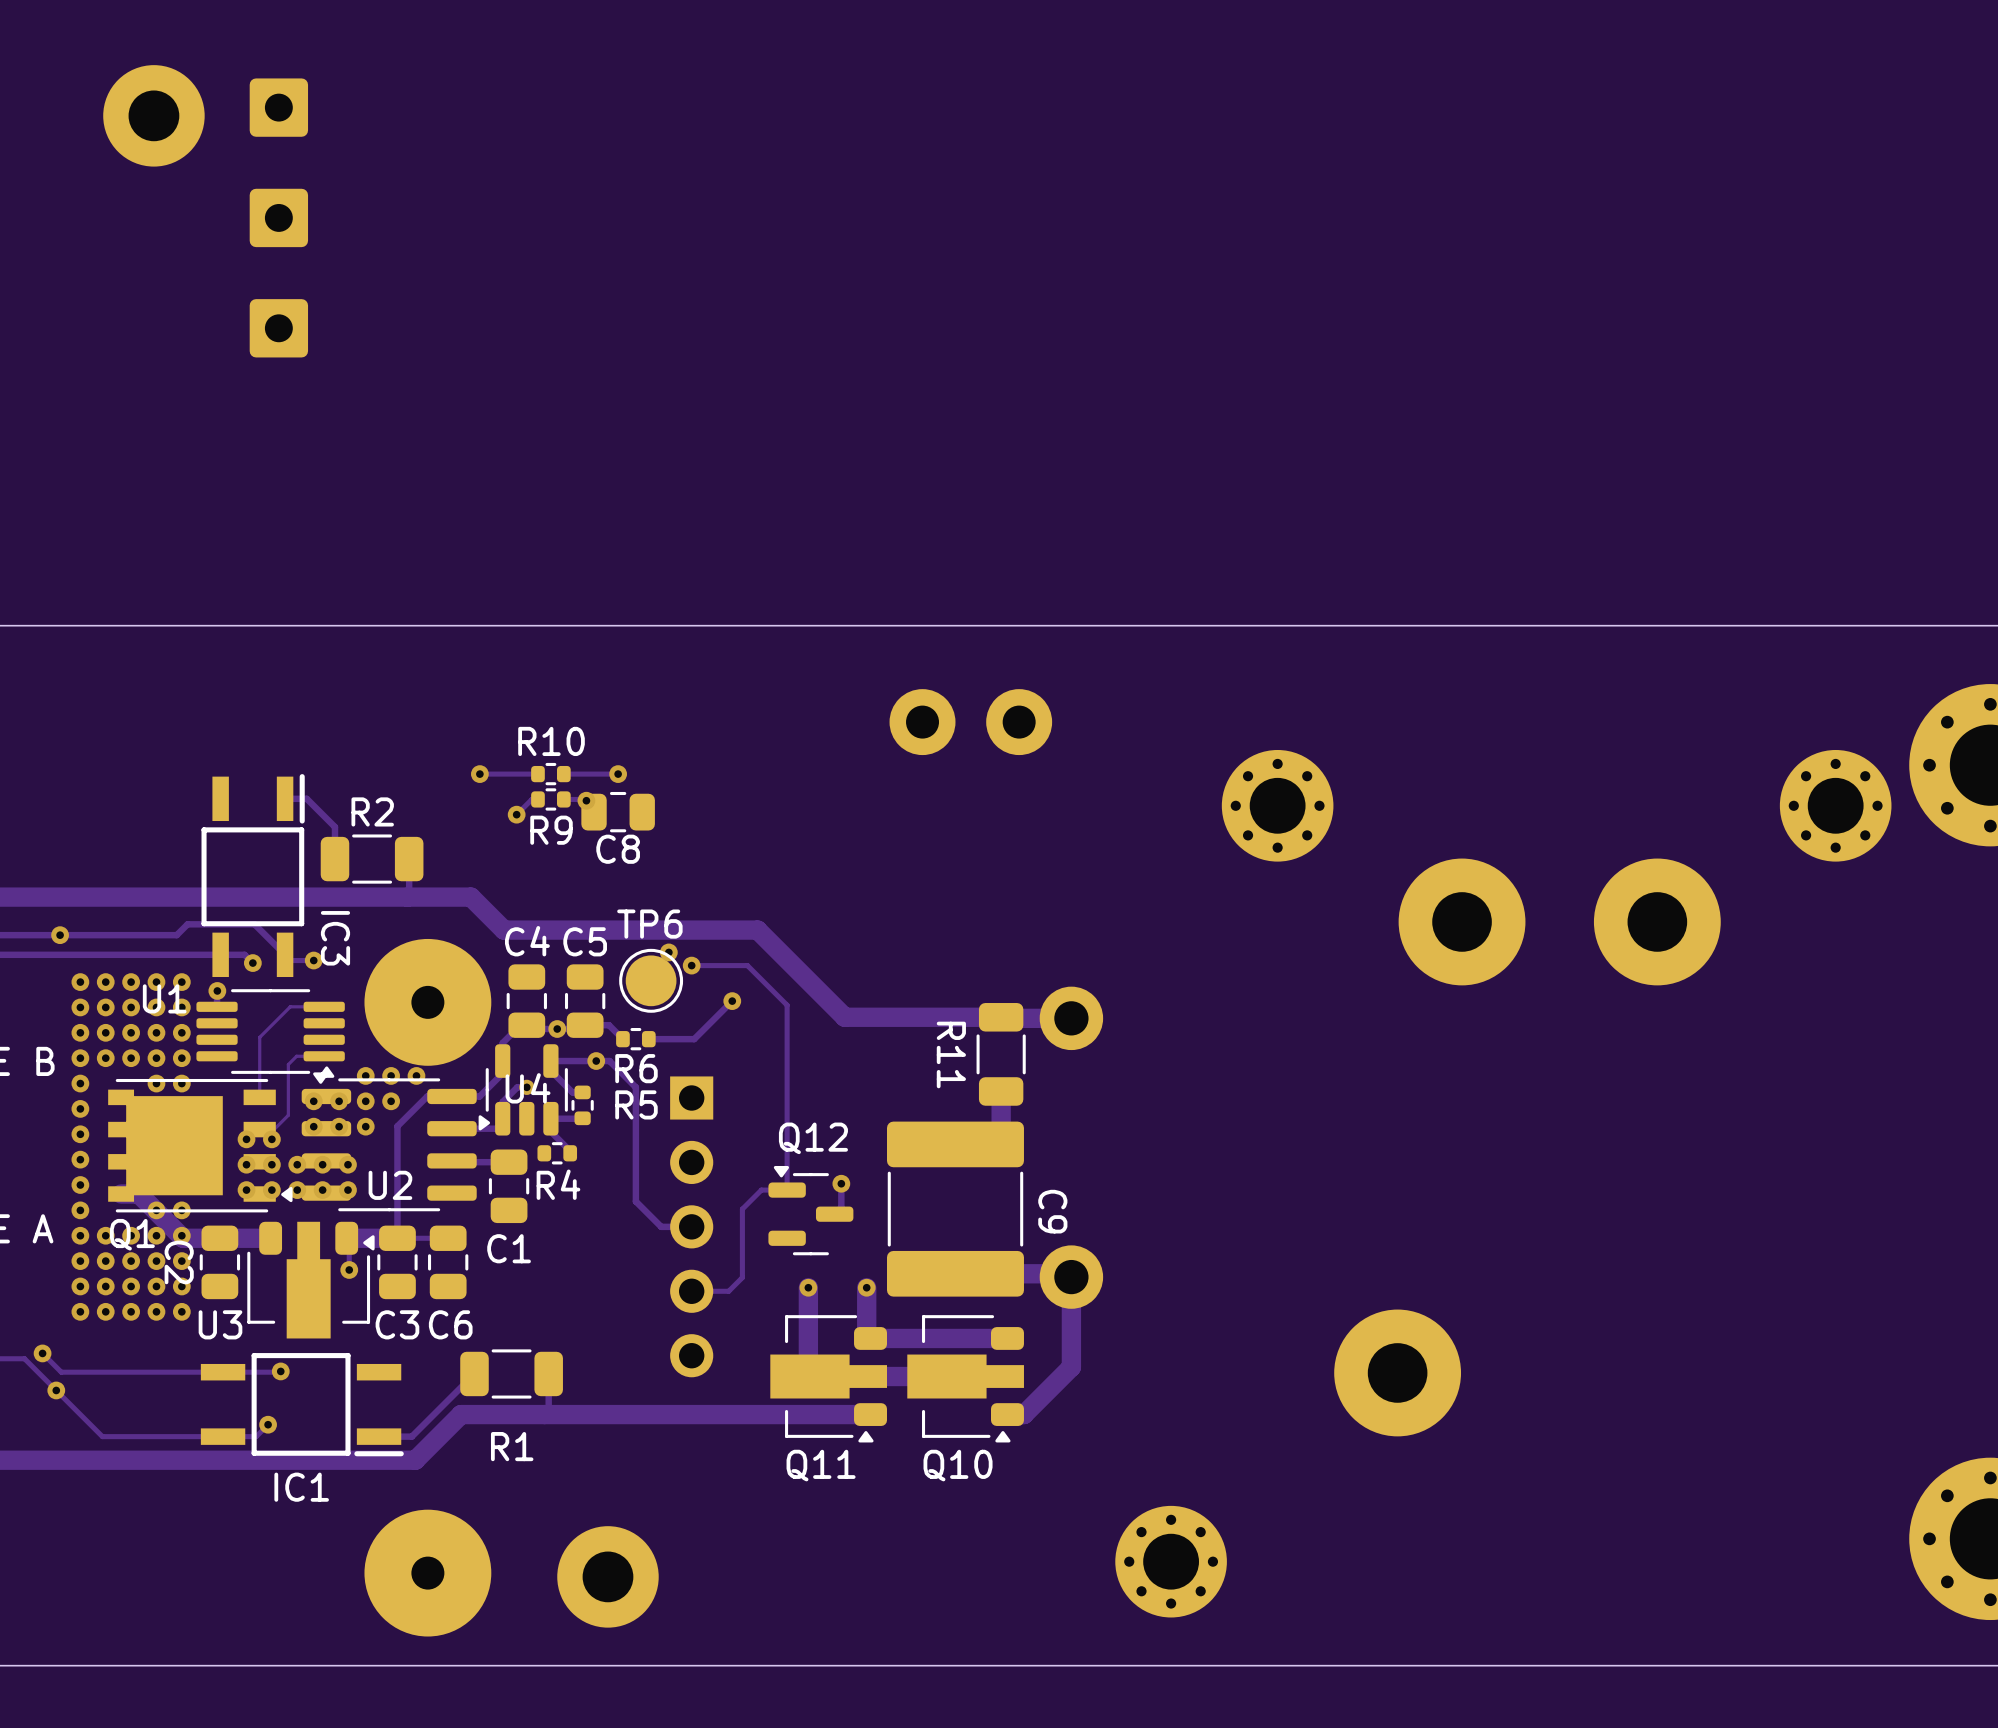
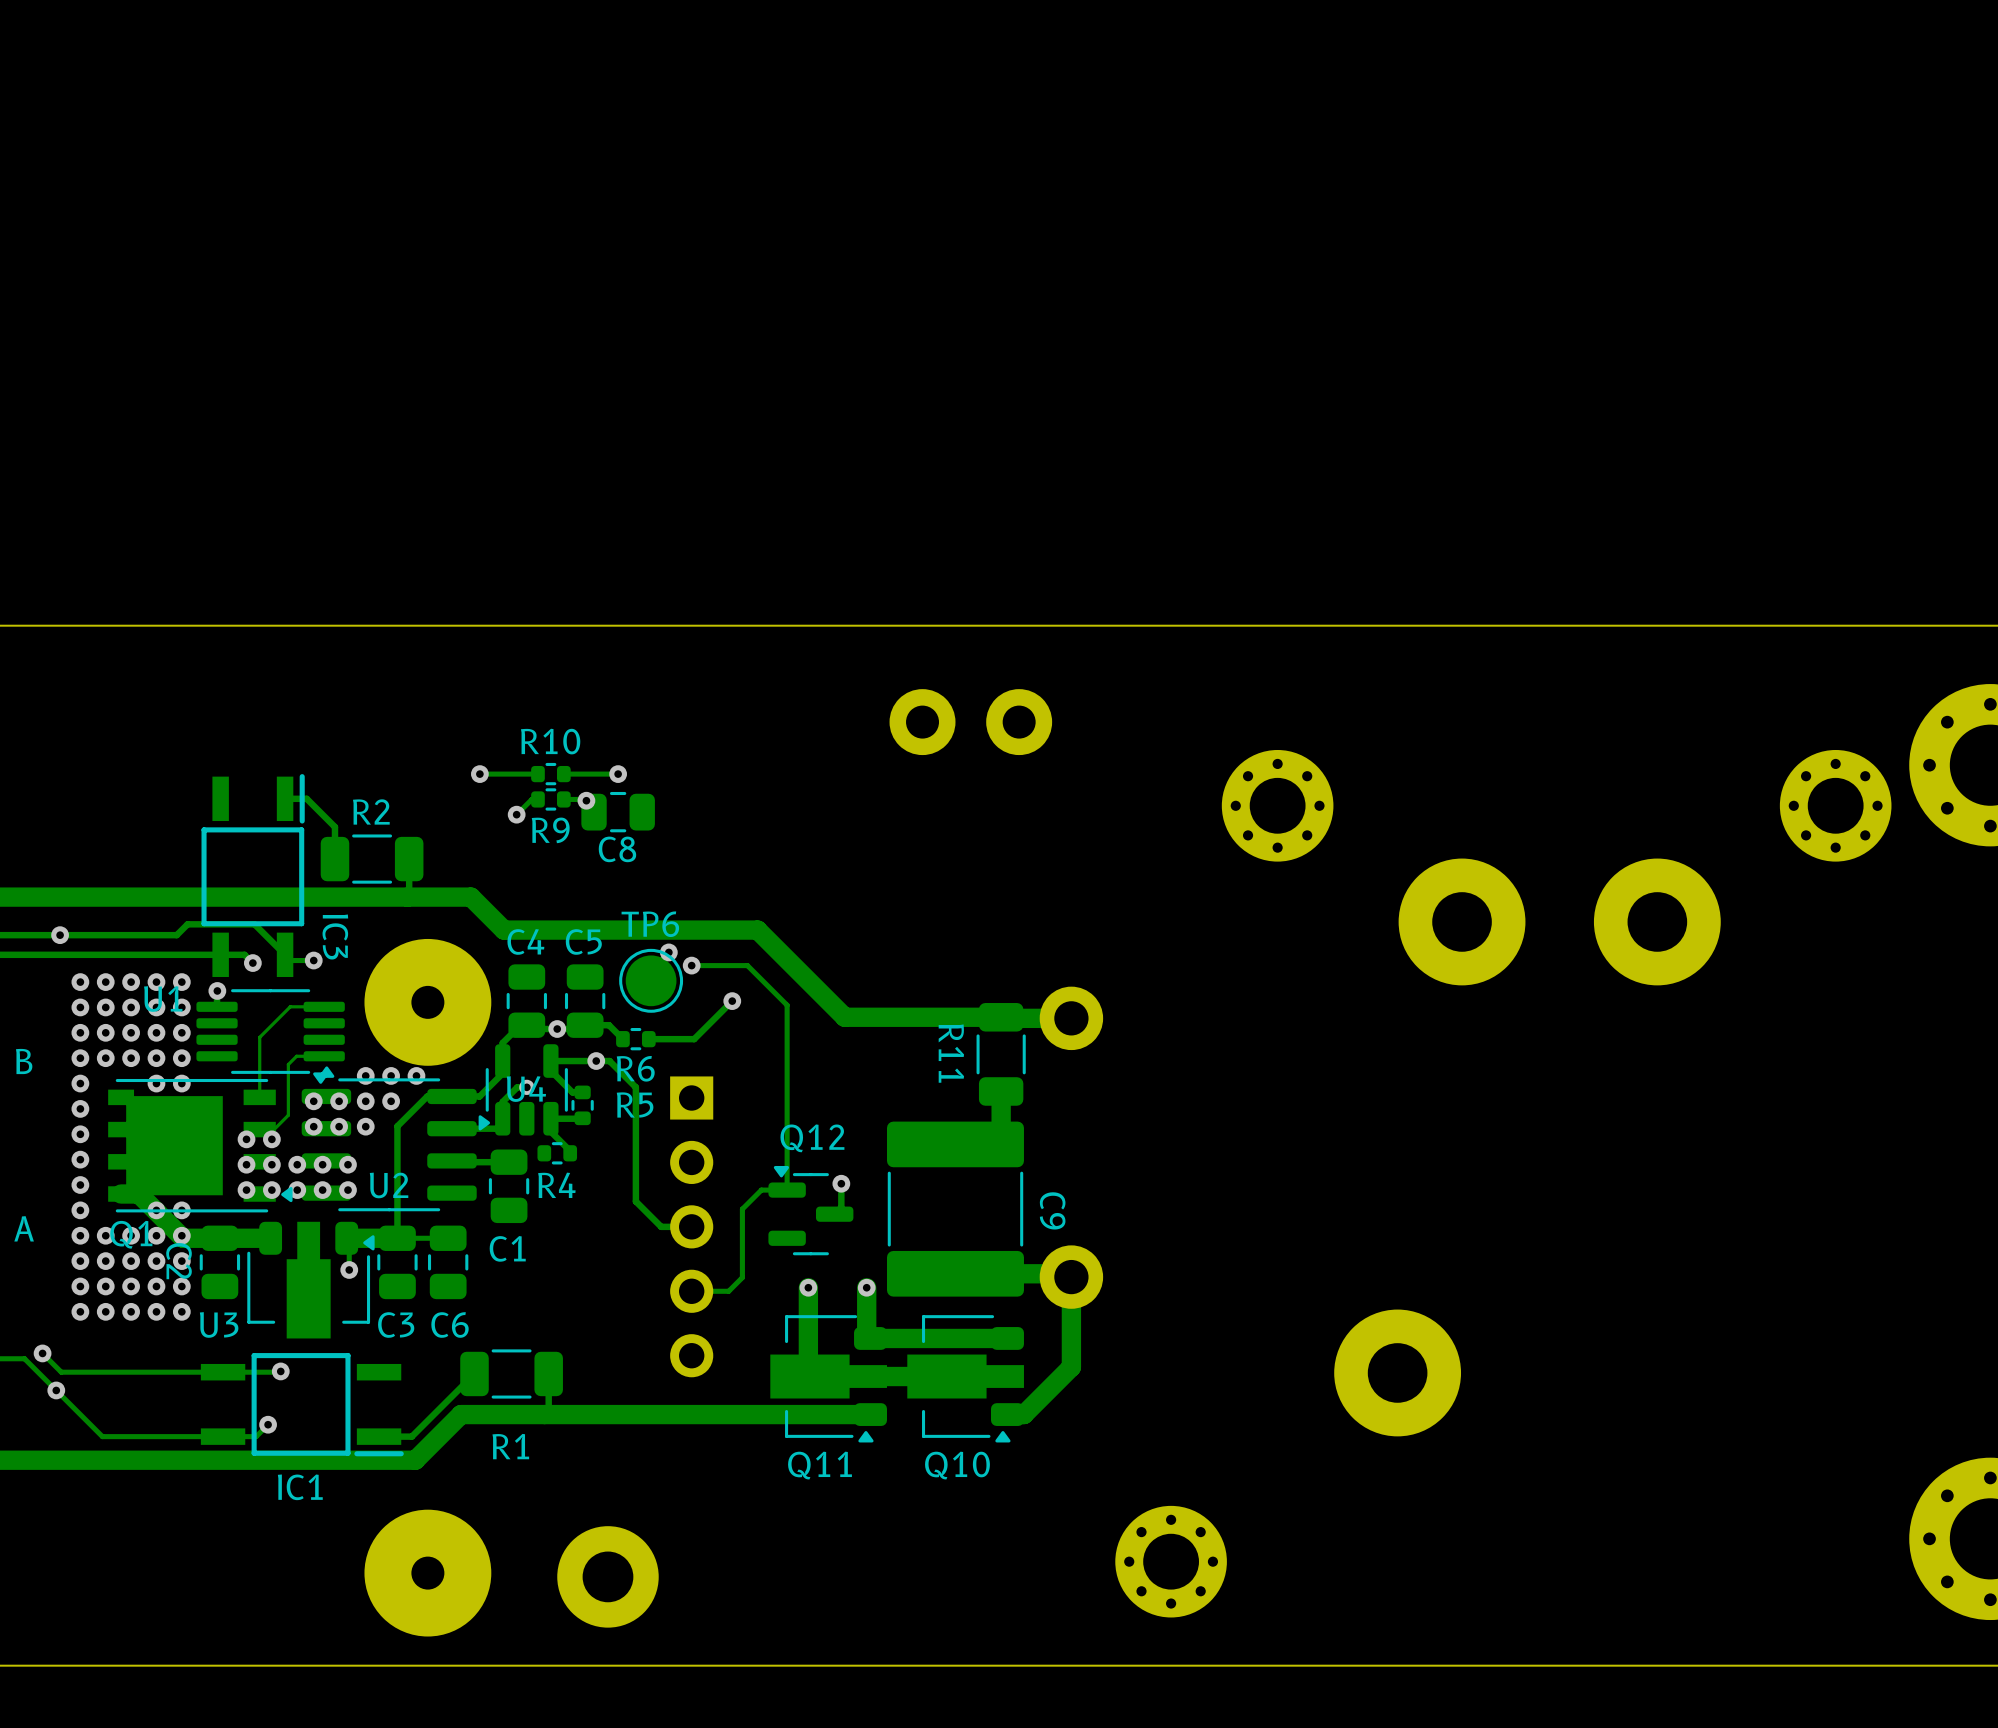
part: (278, 107) -> none
part: (153, 115) -> none
part: (278, 217) -> none
part: (278, 328) -> none

